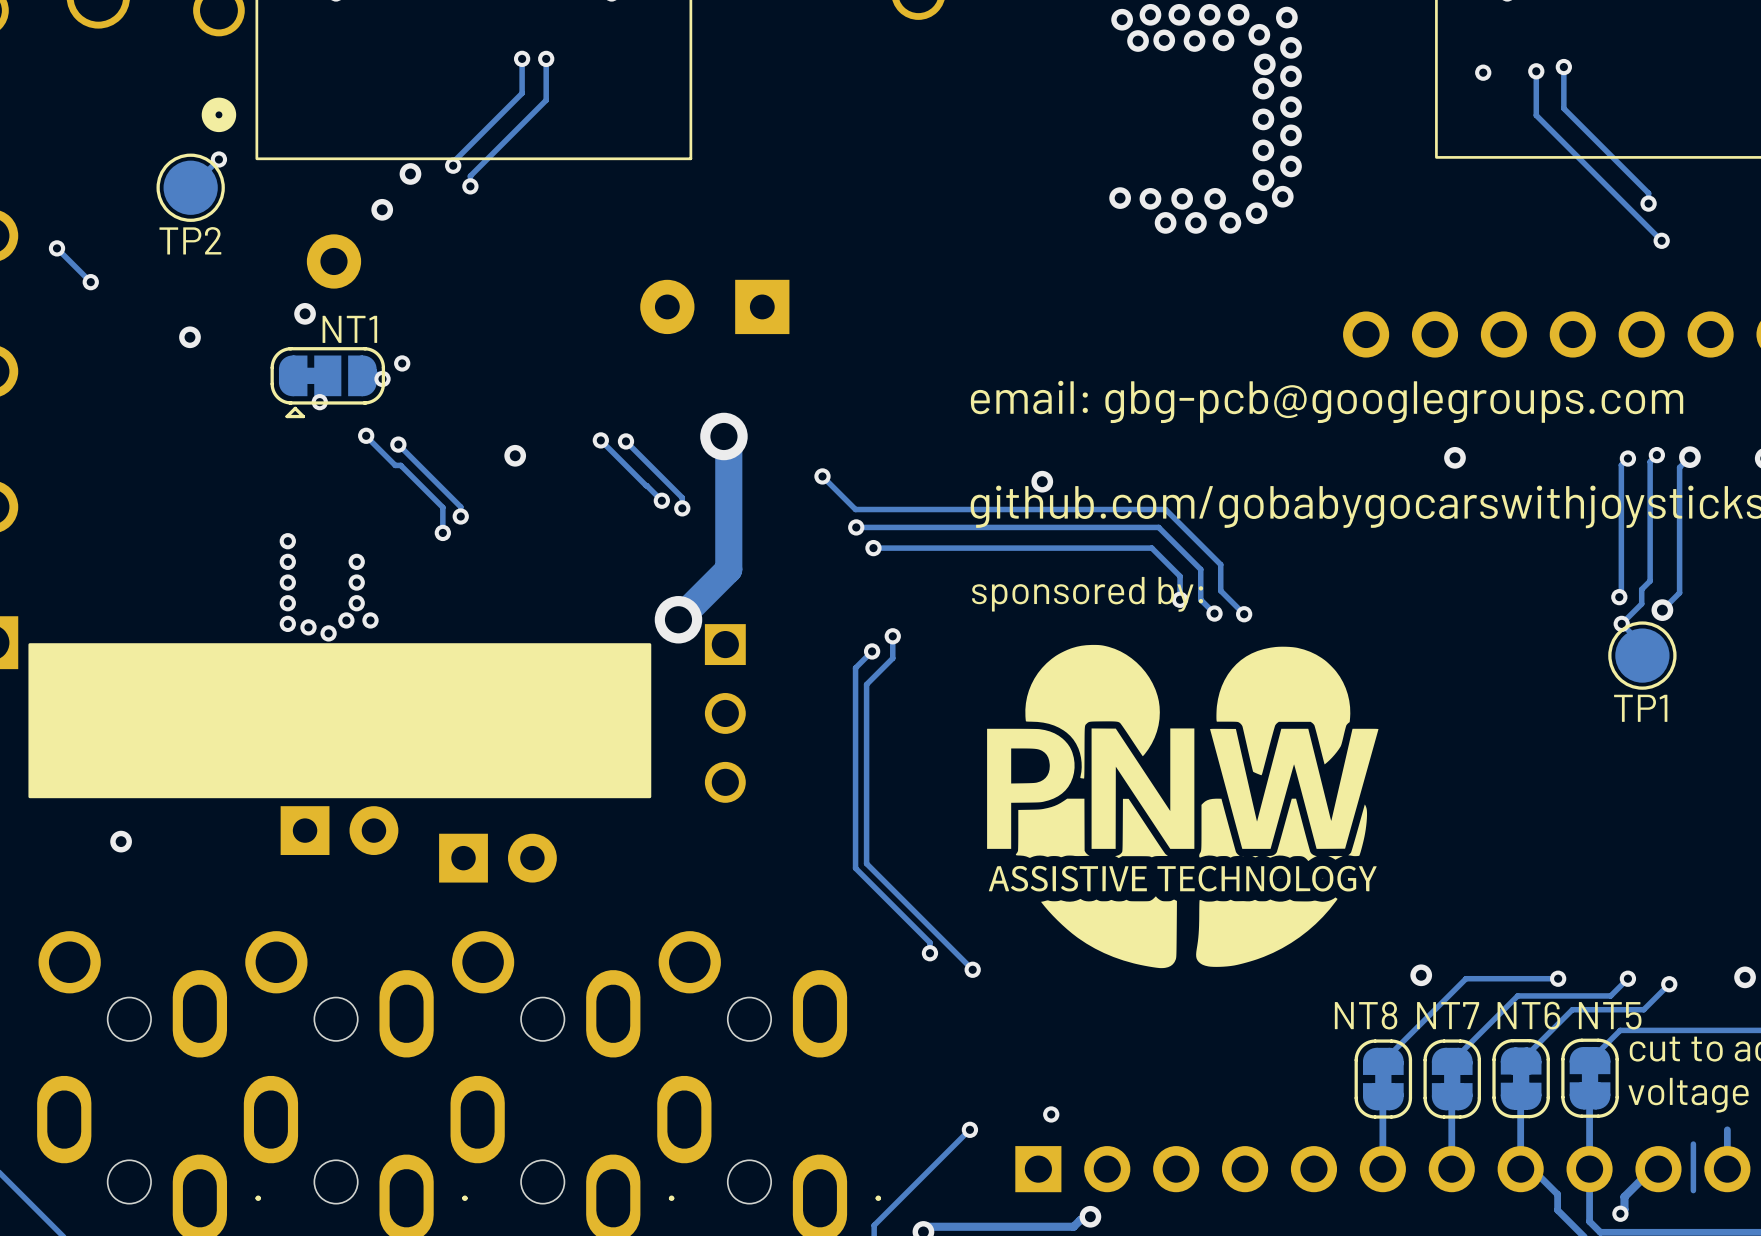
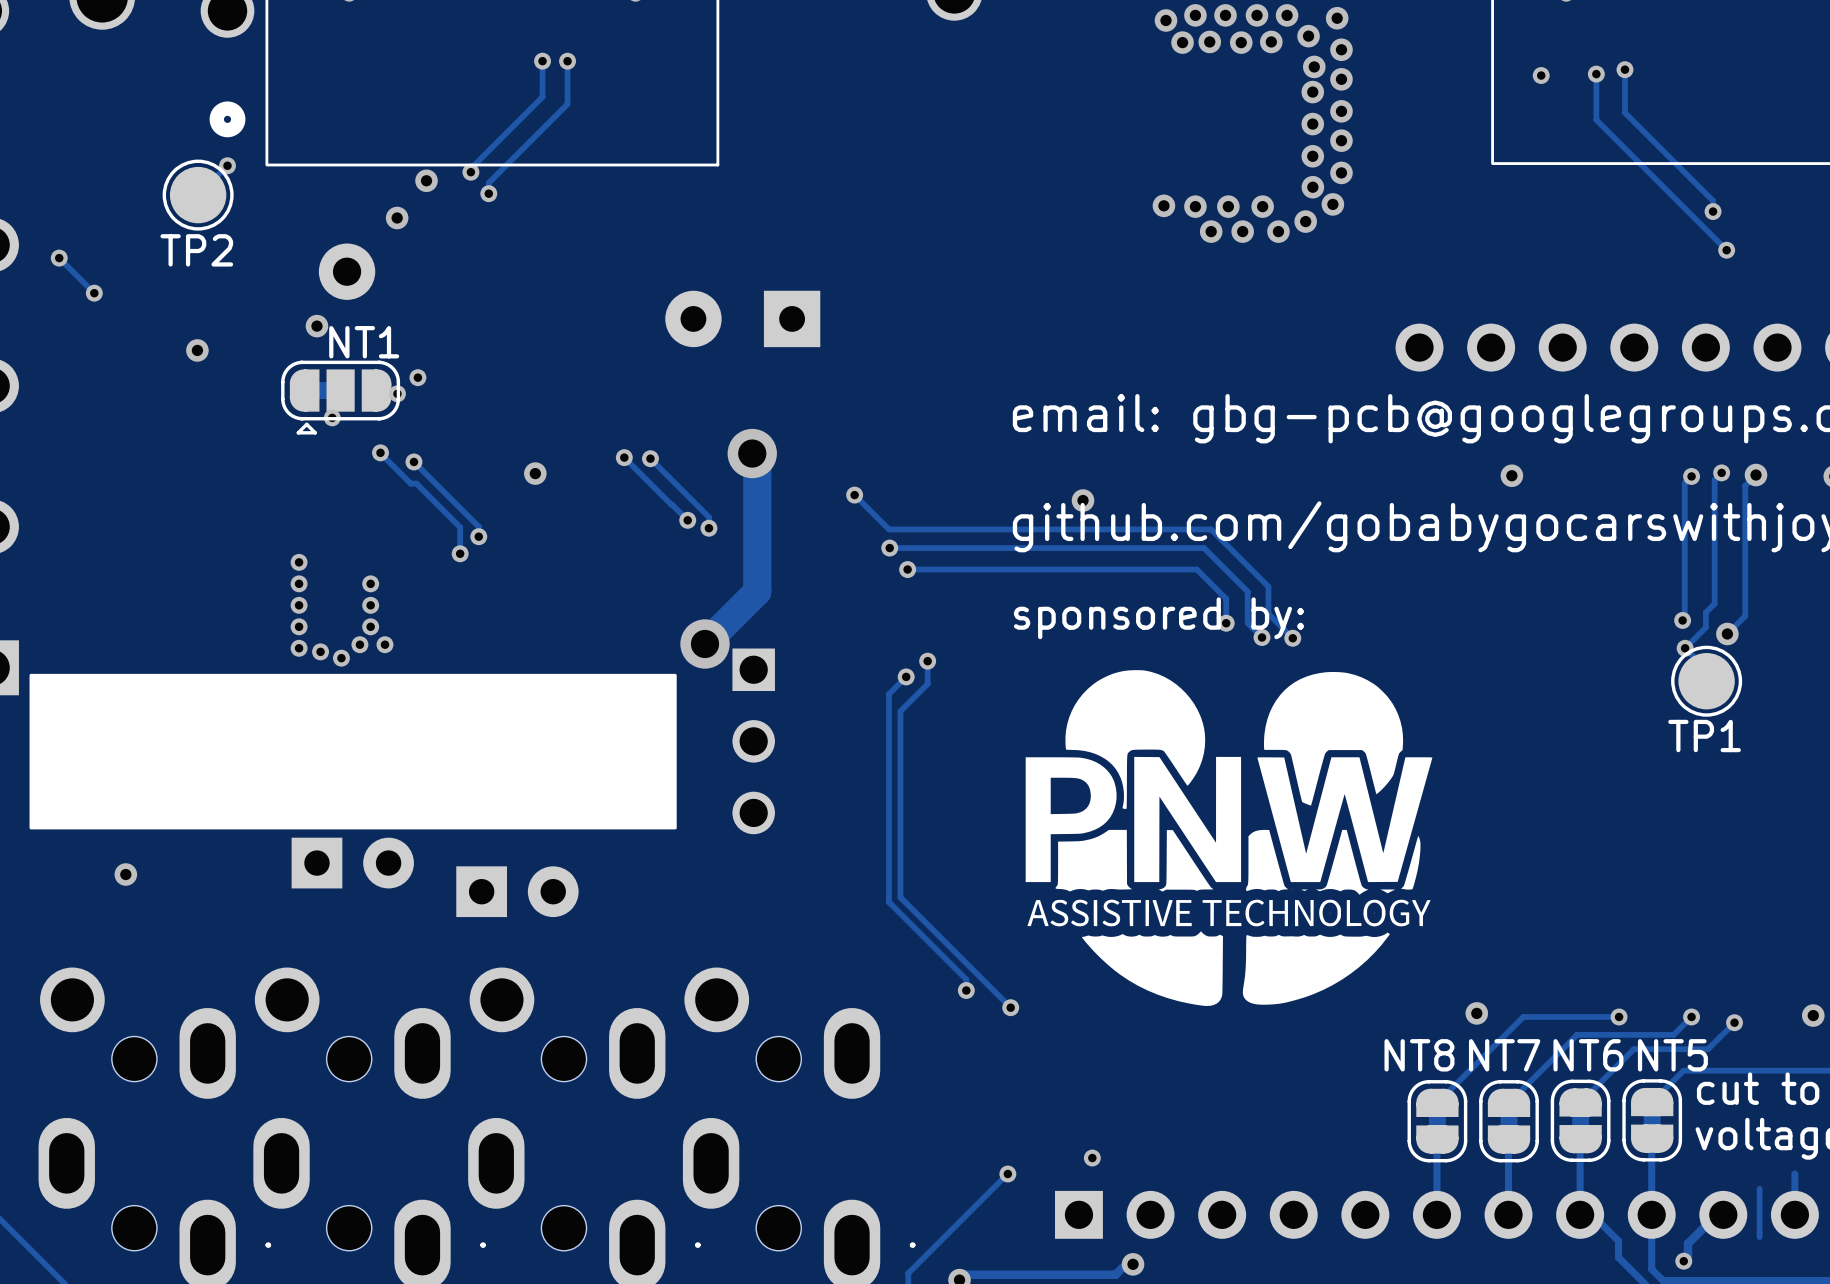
drawing shape: [28, 643, 652, 799] -> [29, 673, 677, 830]

